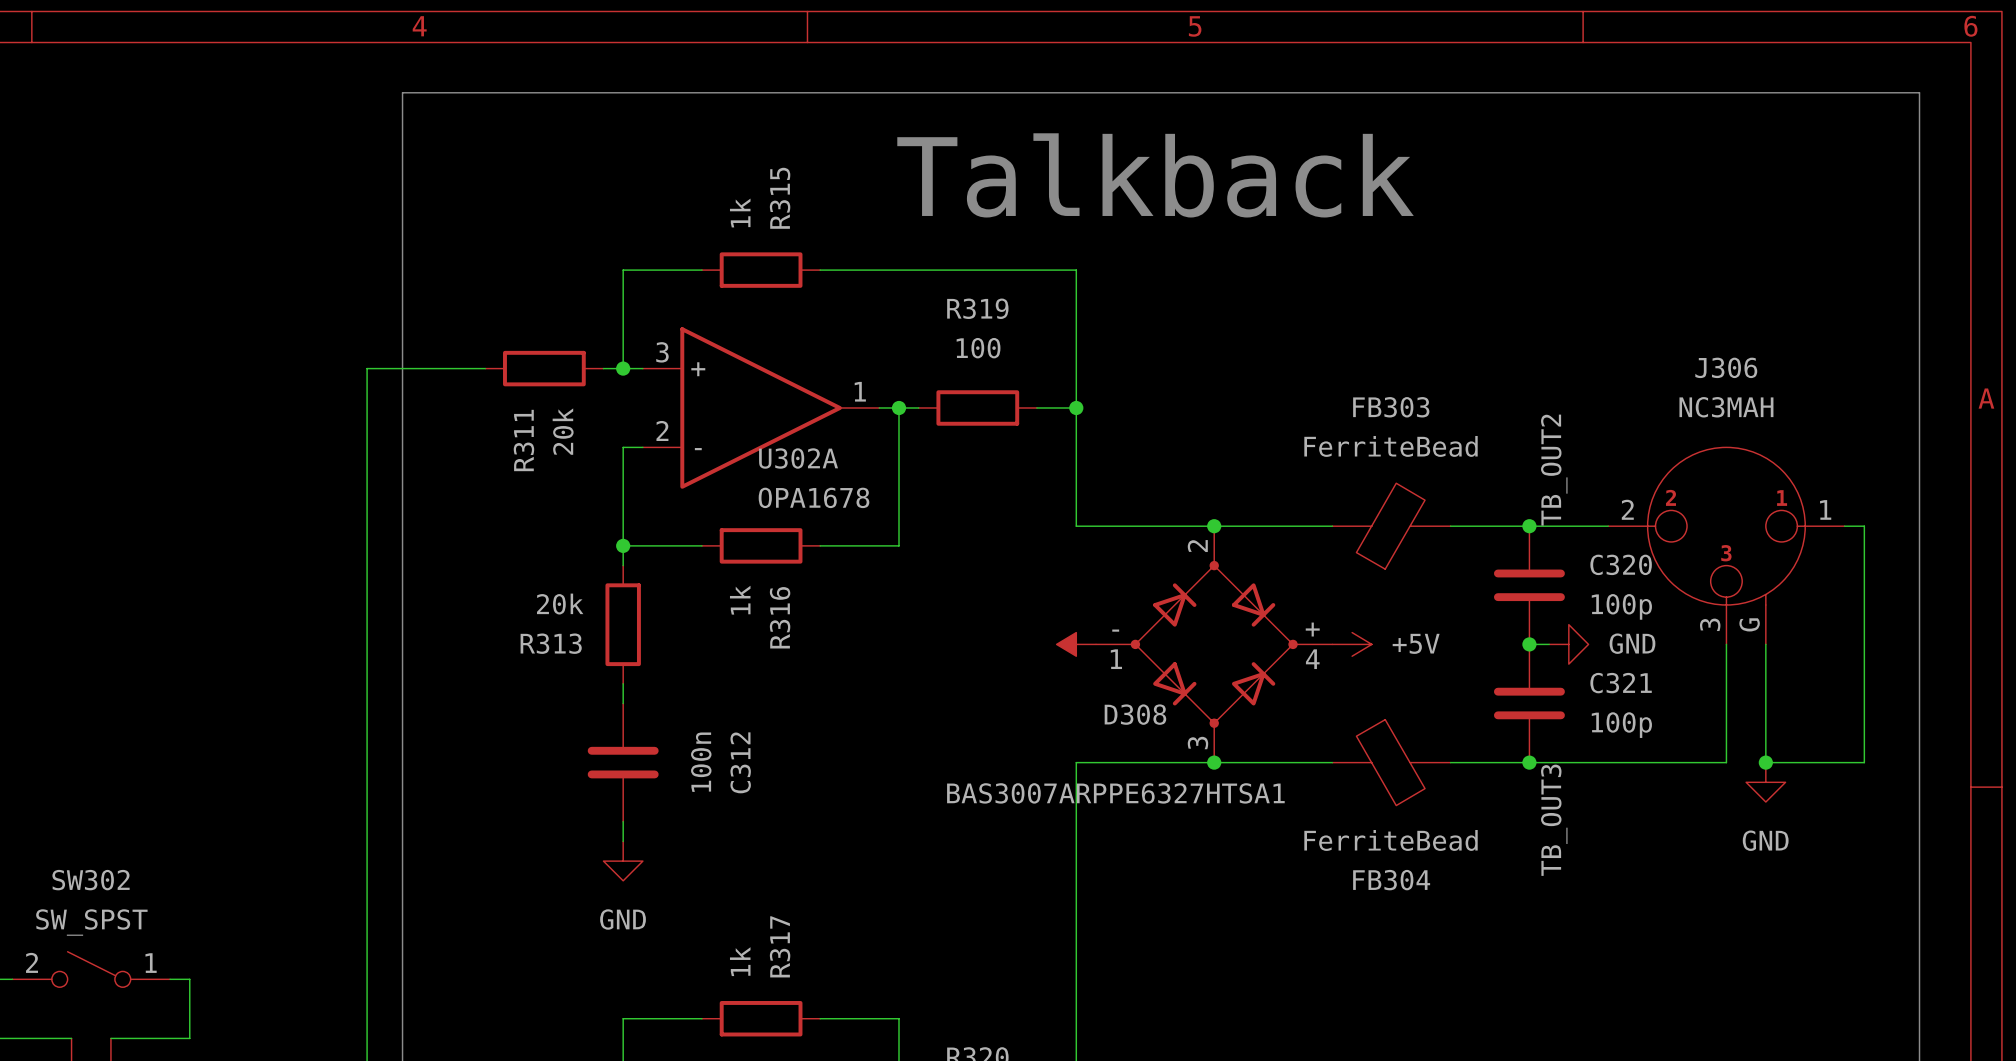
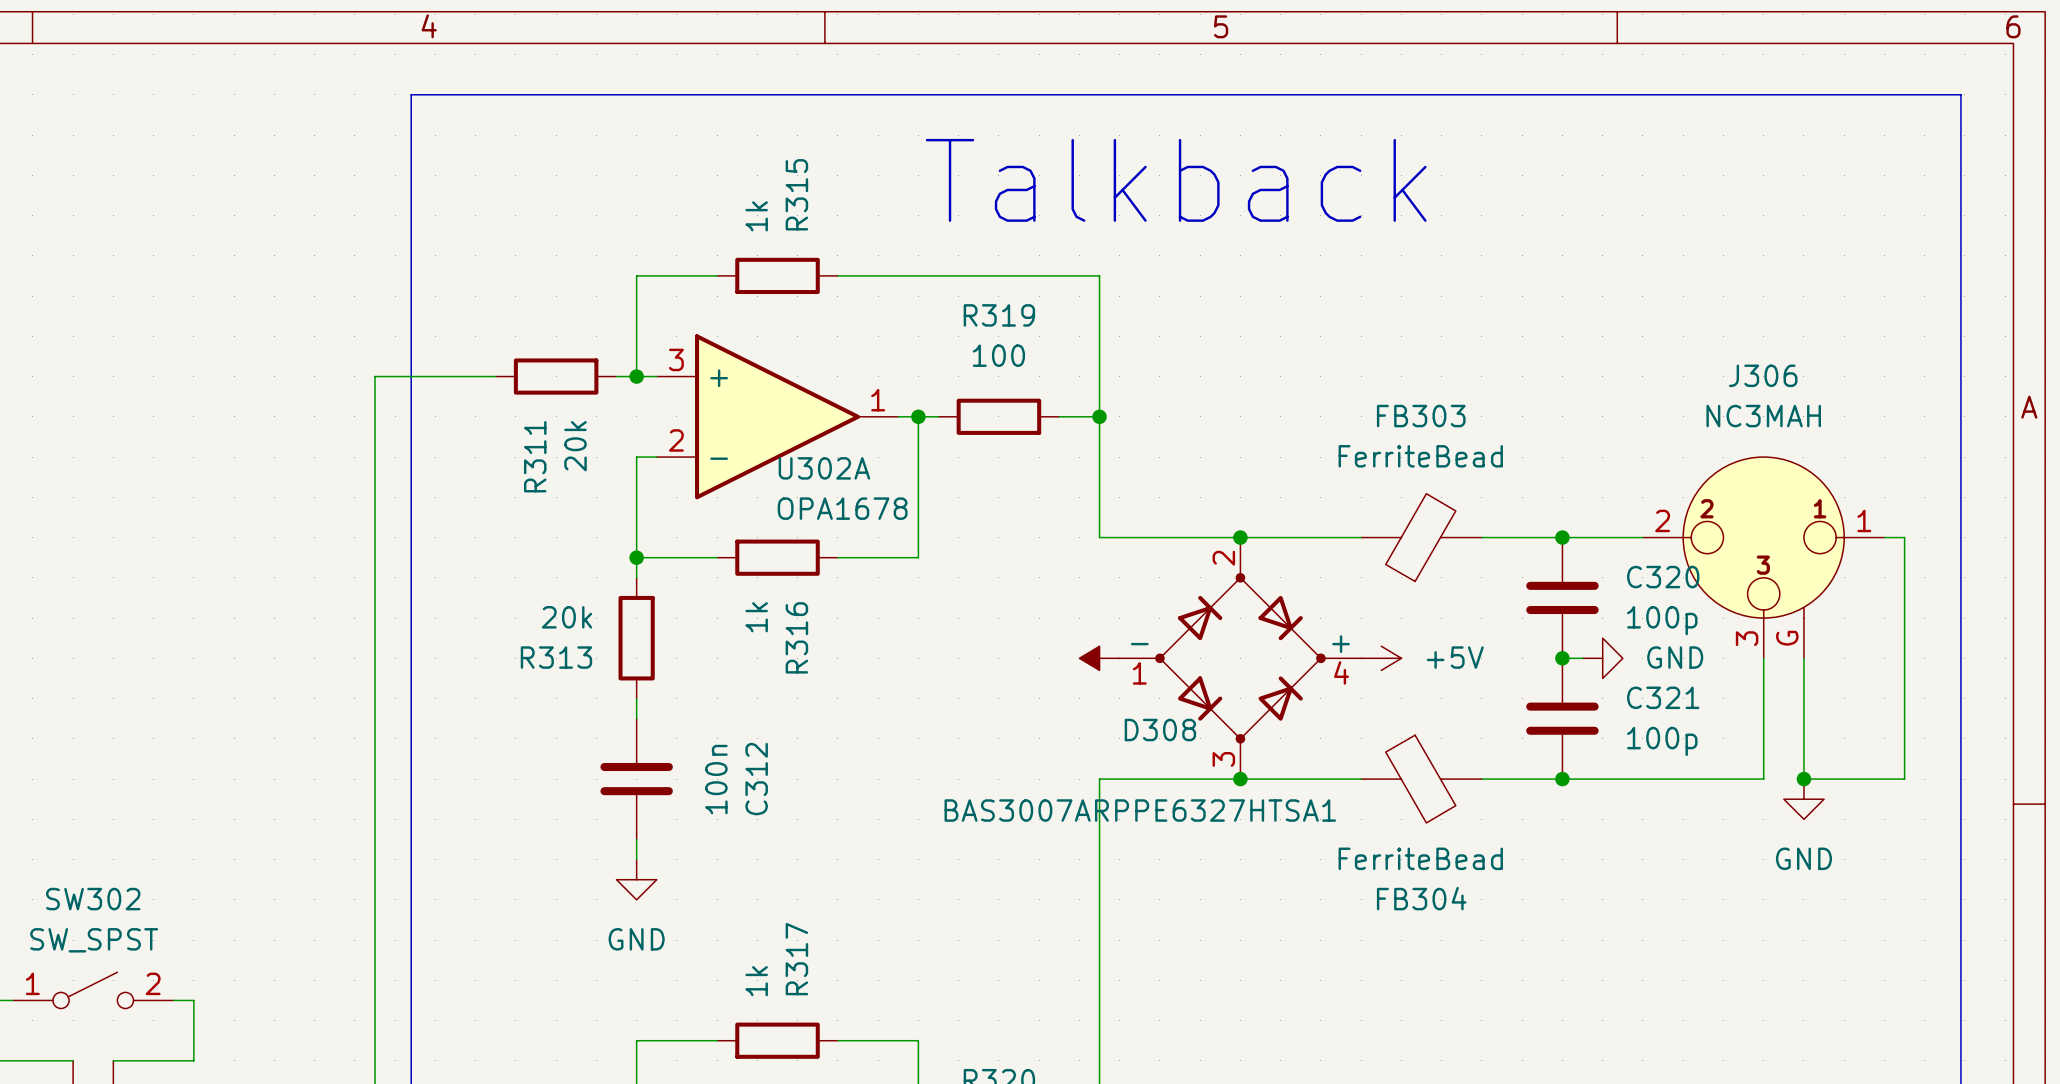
label: TB_OUT2 (1554, 470) -> none
label: TB_OUT3 (1554, 820) -> none
SW302 flip: as is (91, 969) -> left-right (93, 990)

